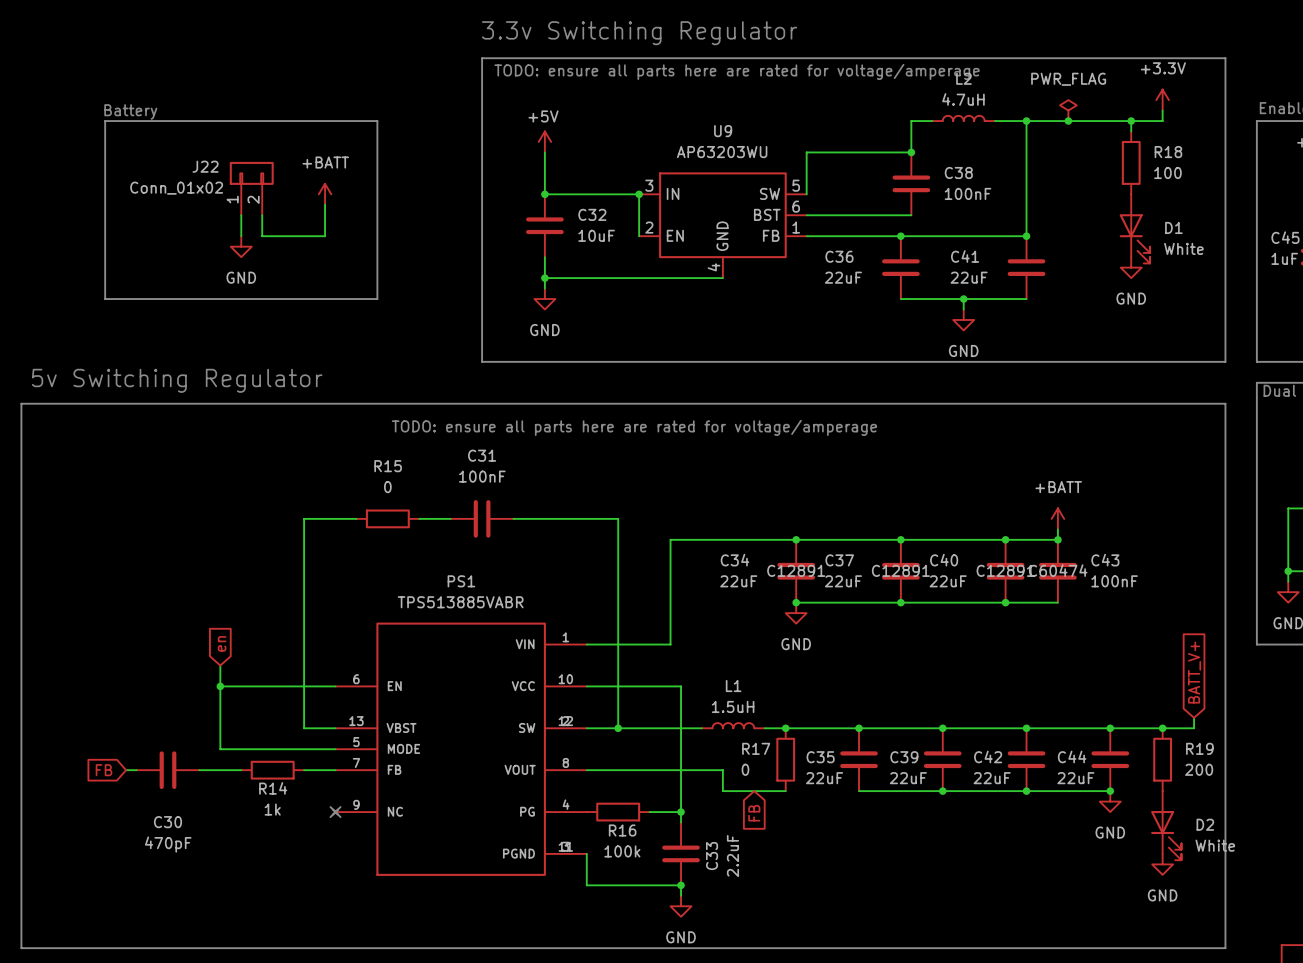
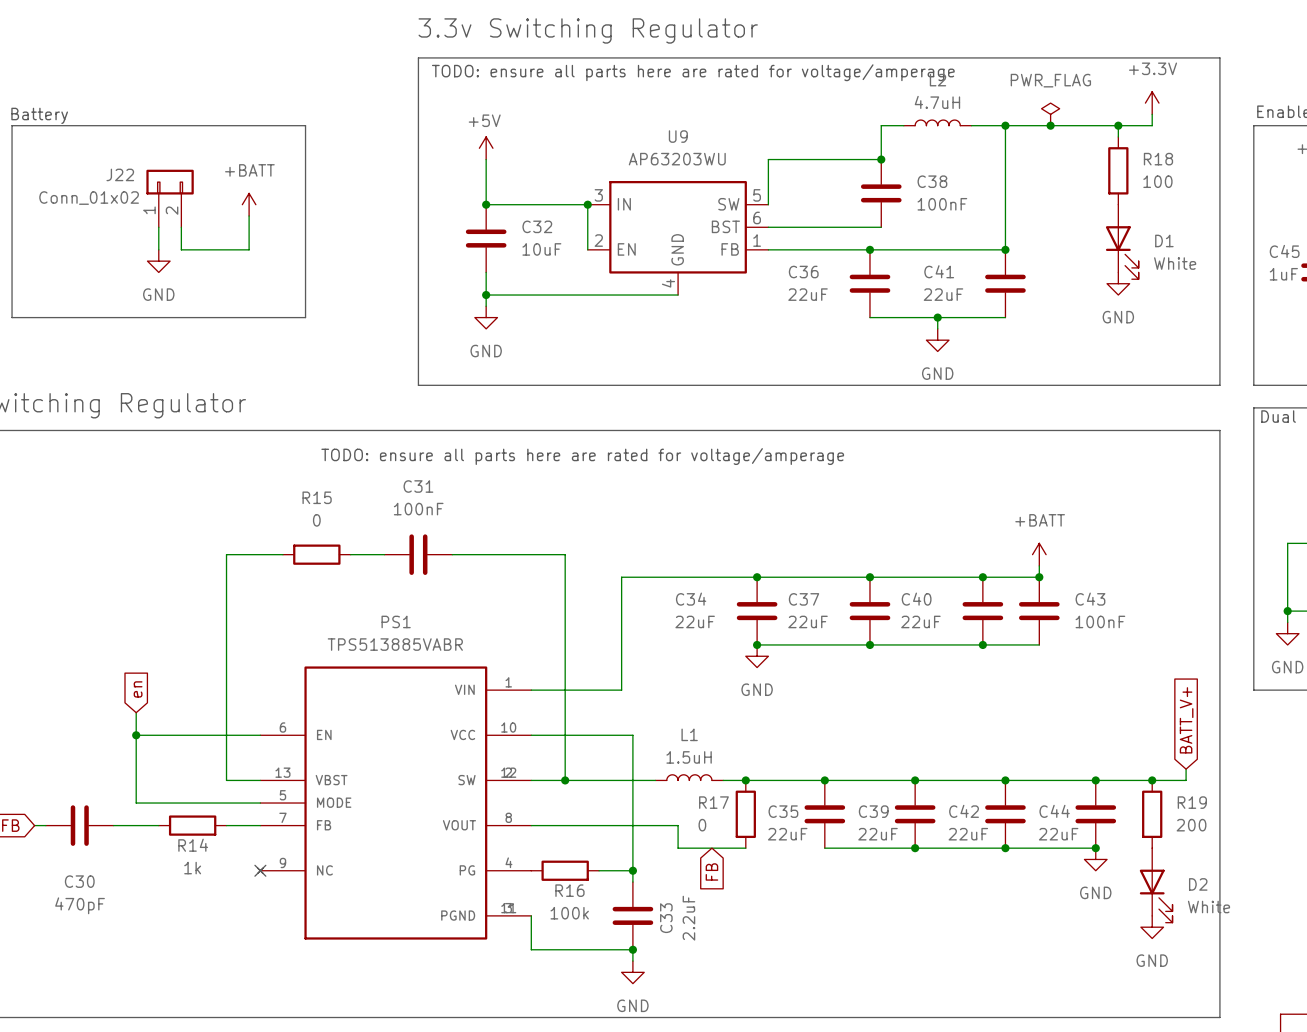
C34 text: C12891 (796, 570) -> none
C37 text: C12891 (900, 570) -> none
C40 text: C12891 (1005, 570) -> none
C43 text: C60474 (1058, 570) -> none

